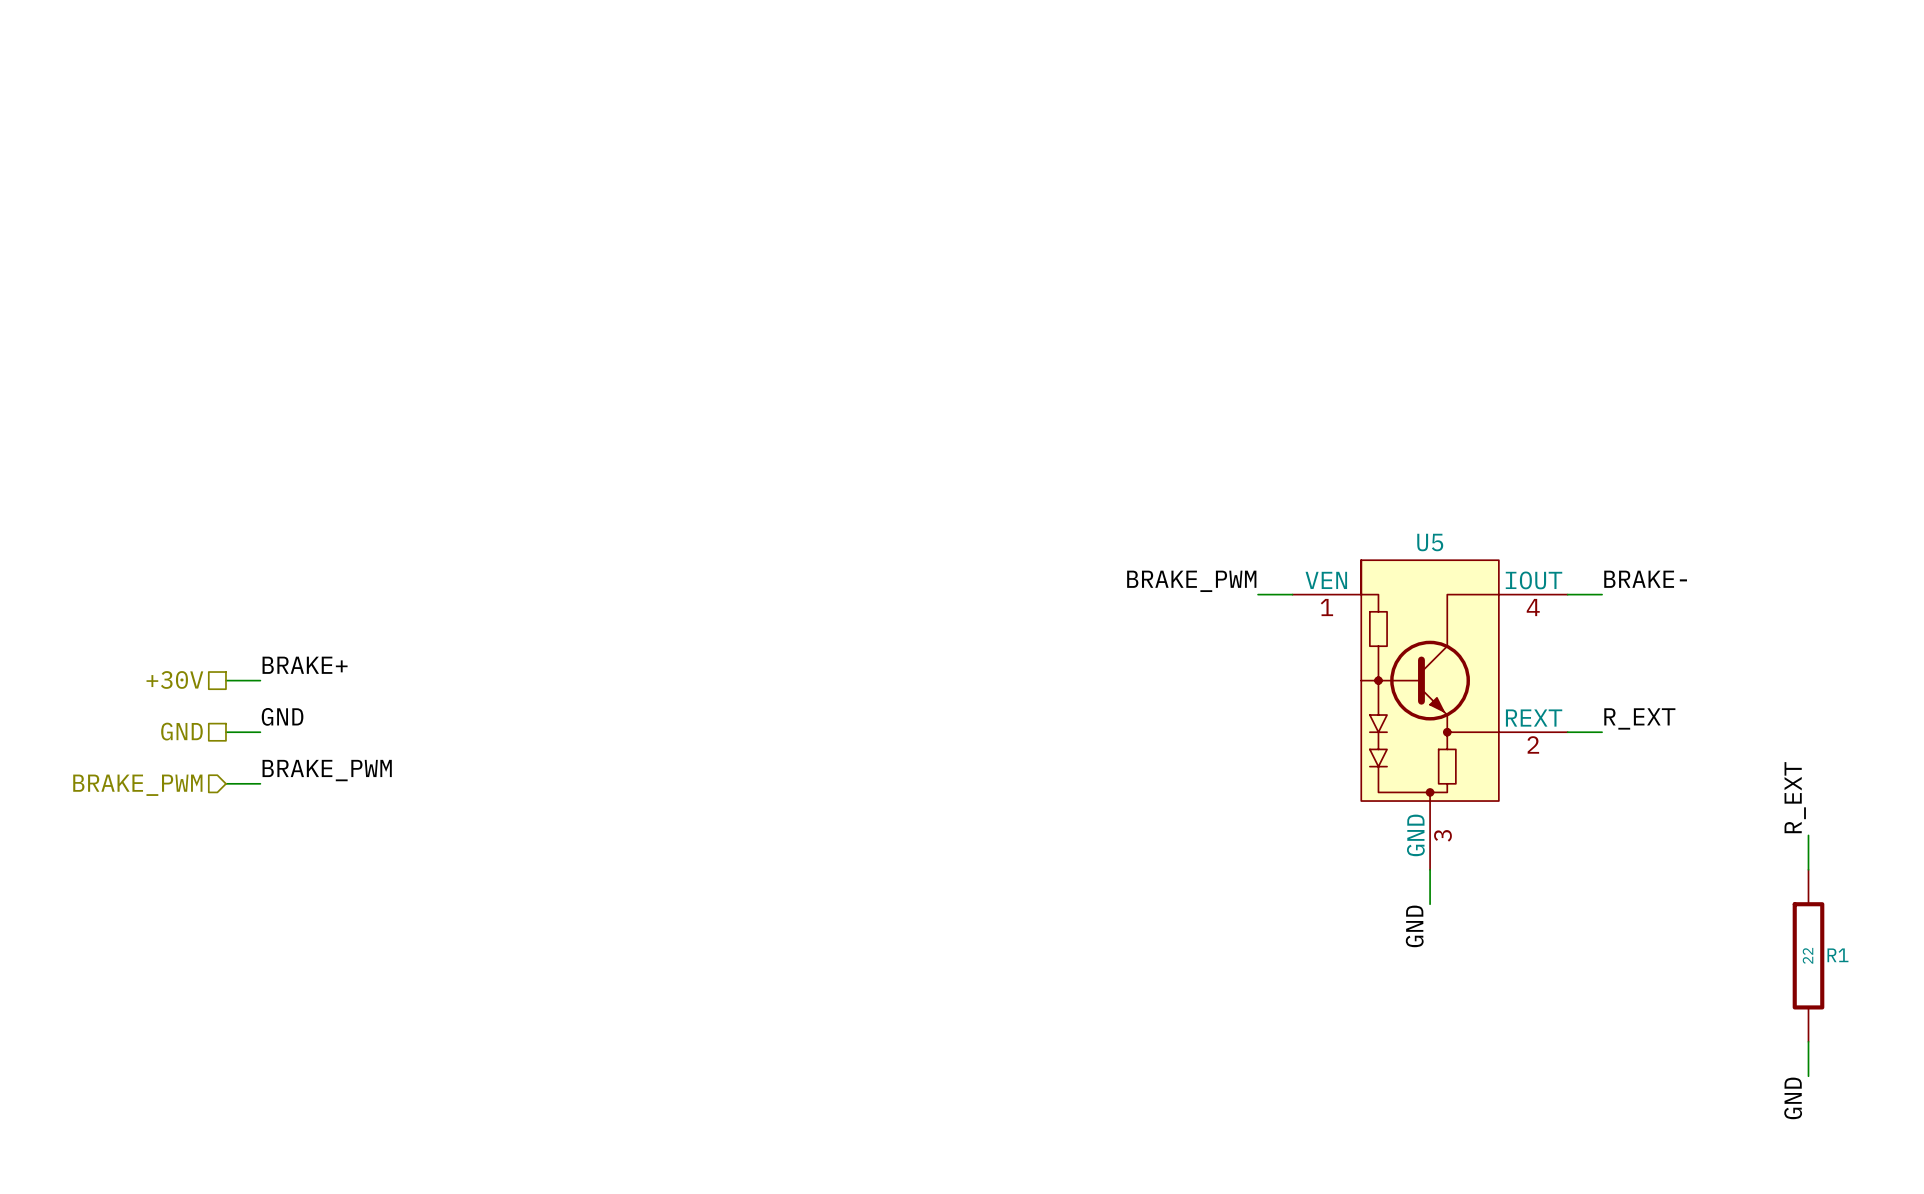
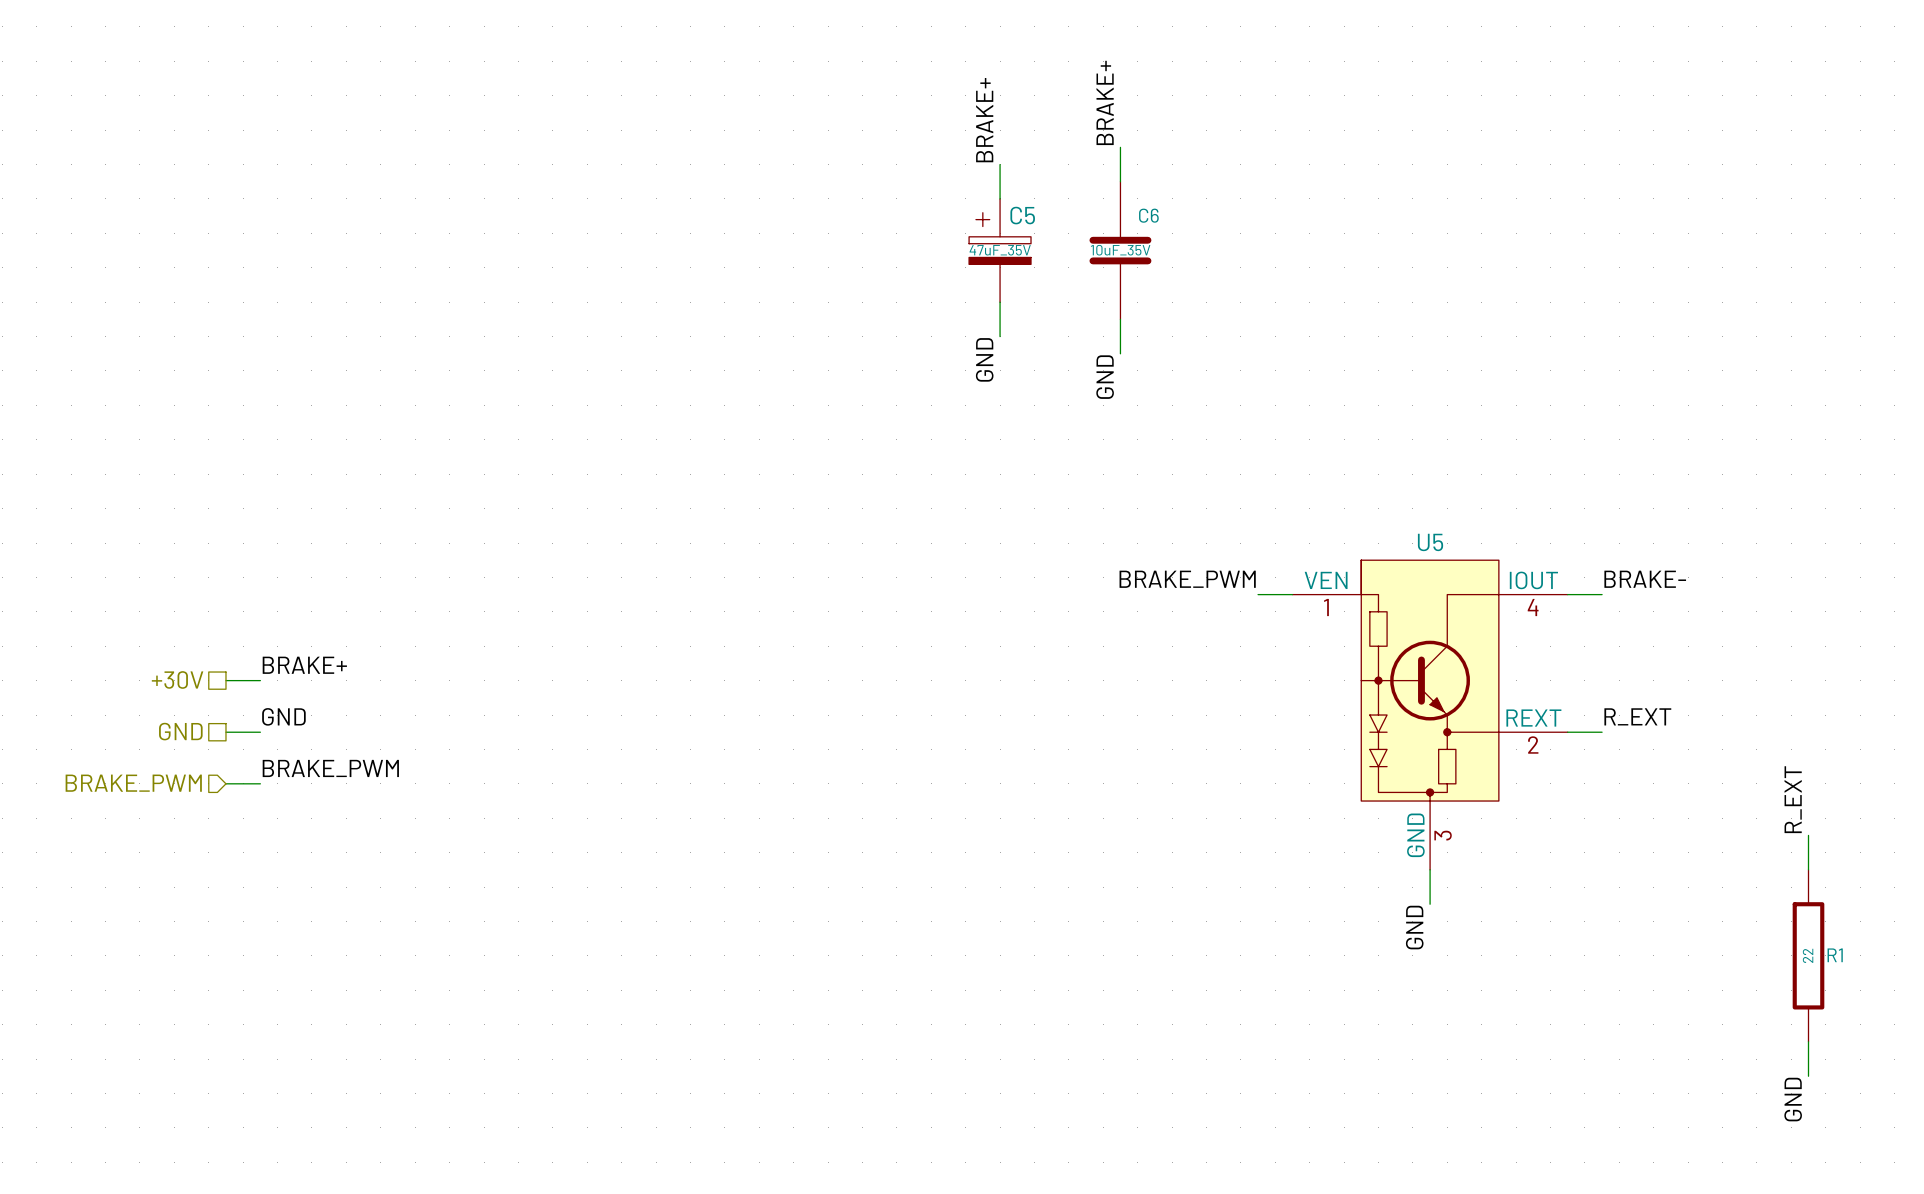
label: none -> BRAKE+ (1105, 102)
label: none -> BRAKE+ (984, 120)
wire: none -> (1120, 147) (1120, 181)
wire: none -> (1000, 164) (1000, 198)
C5: none -> 47uF_35V (1000, 250)
C6: none -> 10uF_35V (1120, 250)
wire: none -> (1000, 302) (1000, 336)
wire: none -> (1120, 319) (1120, 353)
label: none -> GND (984, 359)
label: none -> GND (1105, 377)

